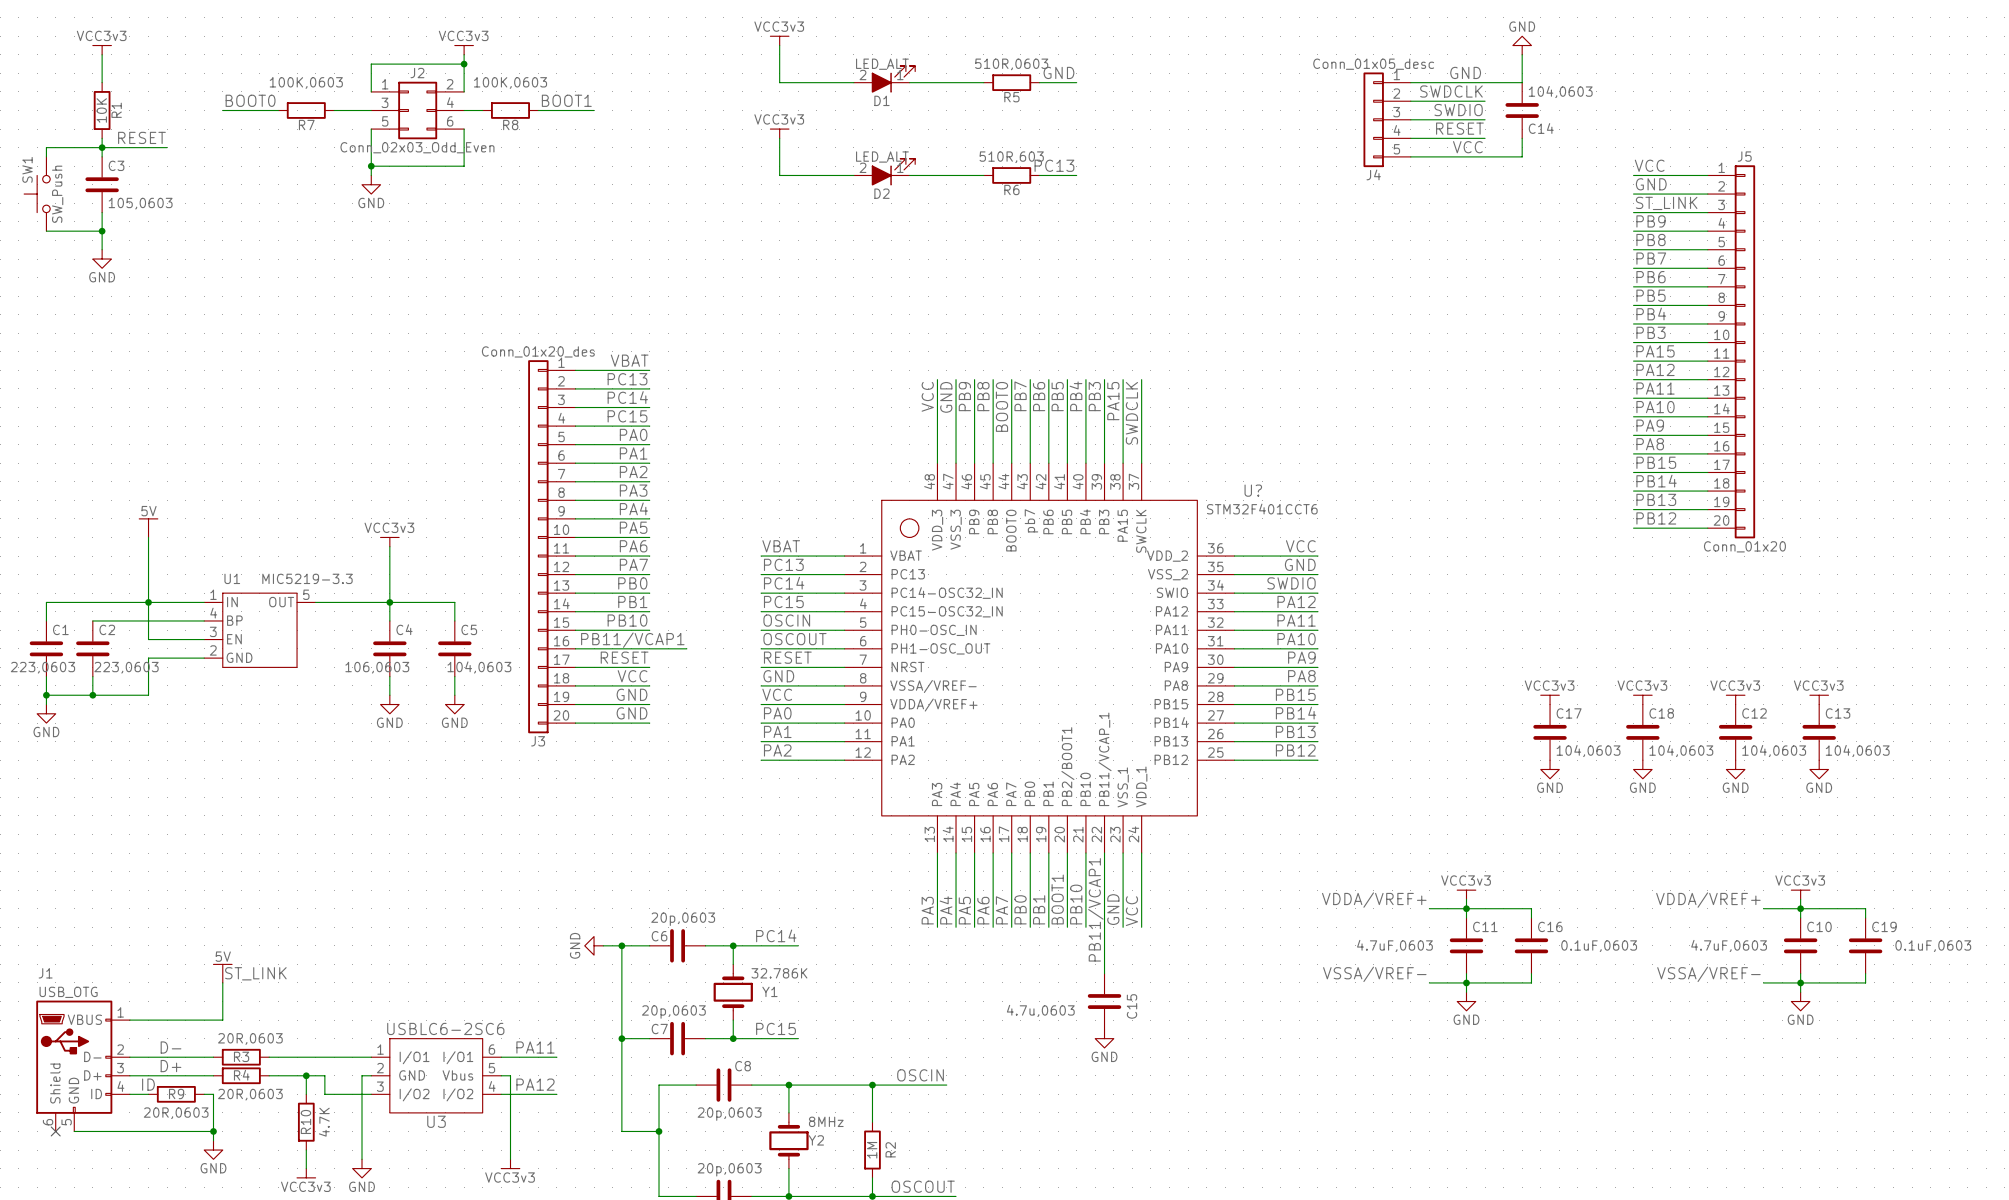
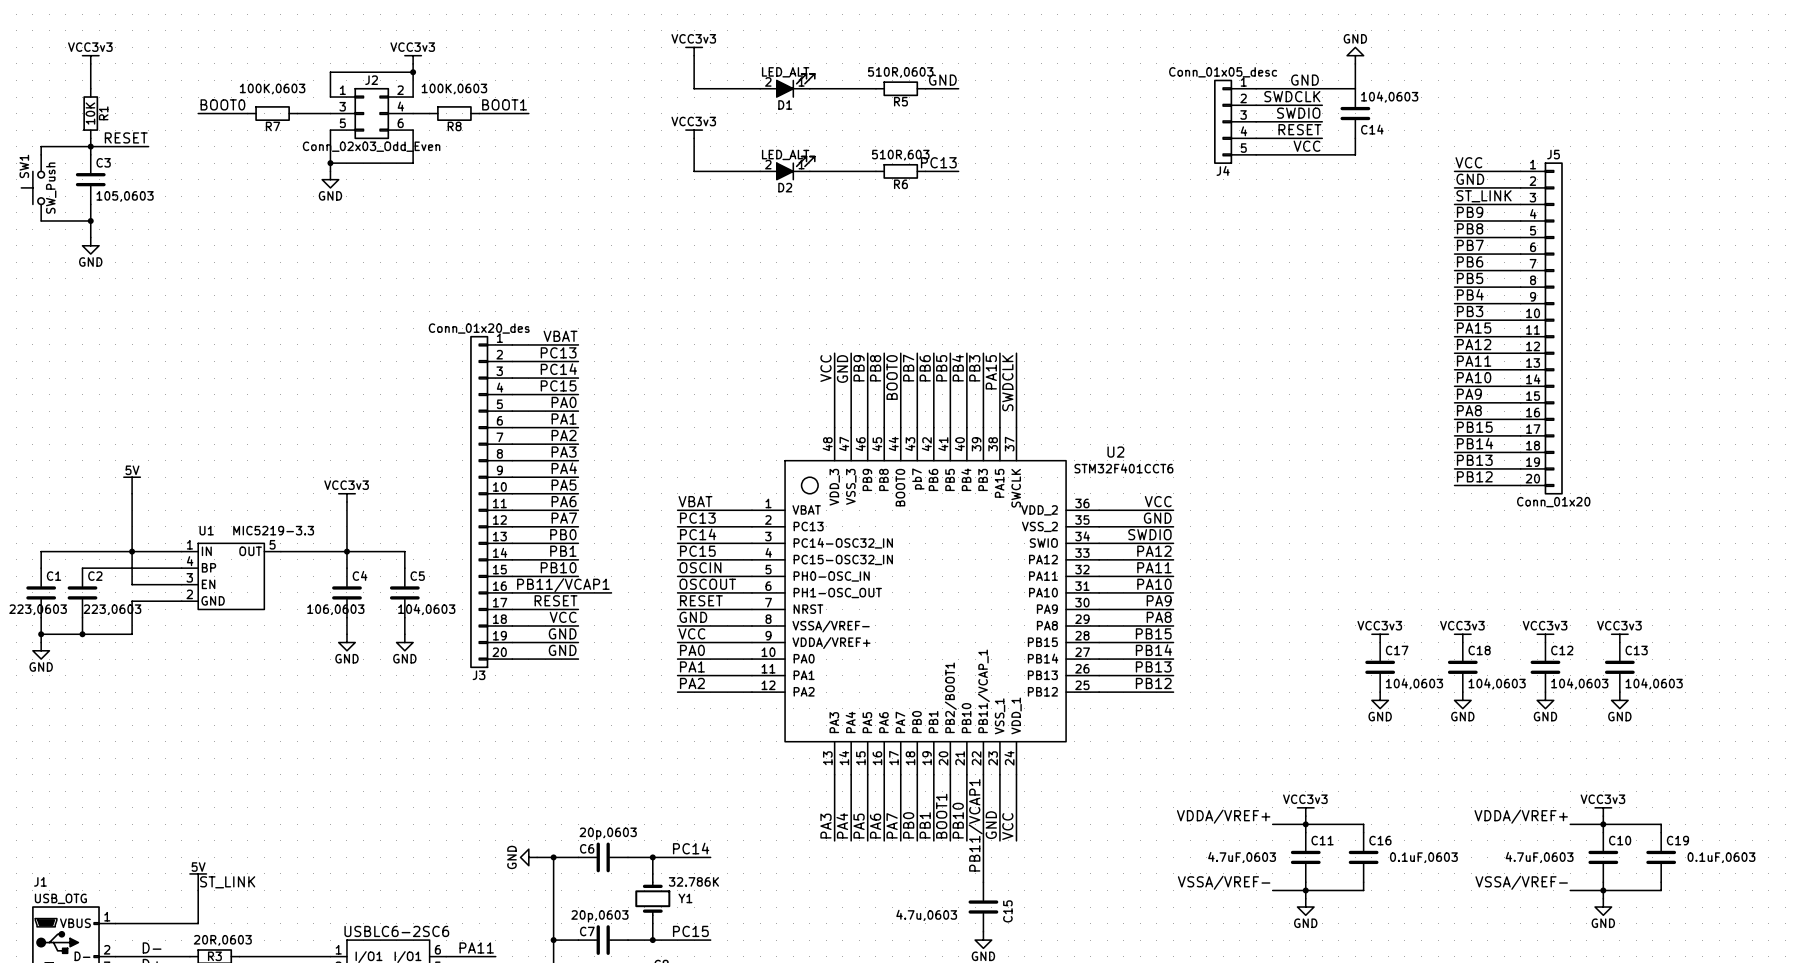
U? name: U? (1253, 490) -> U2 (1115, 452)

